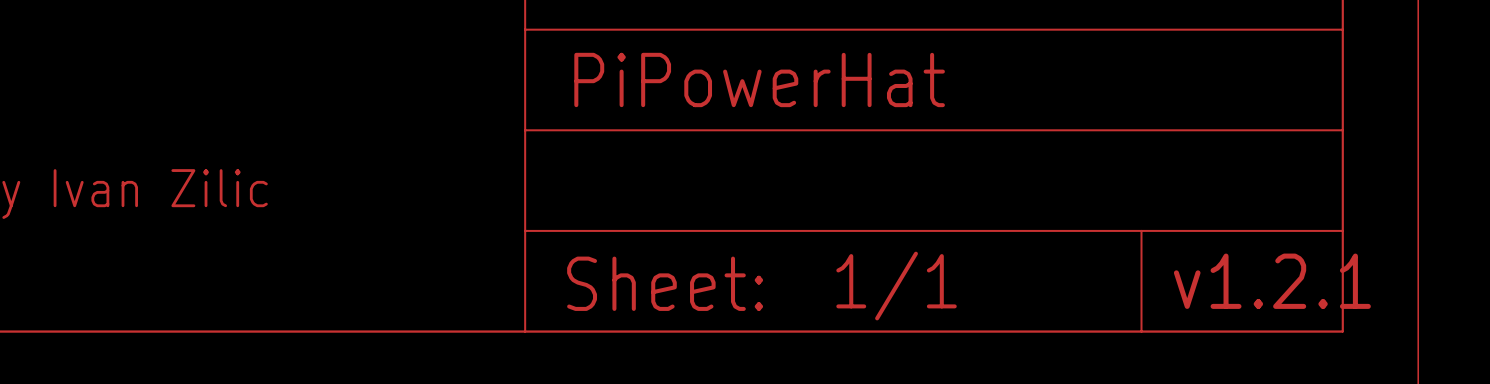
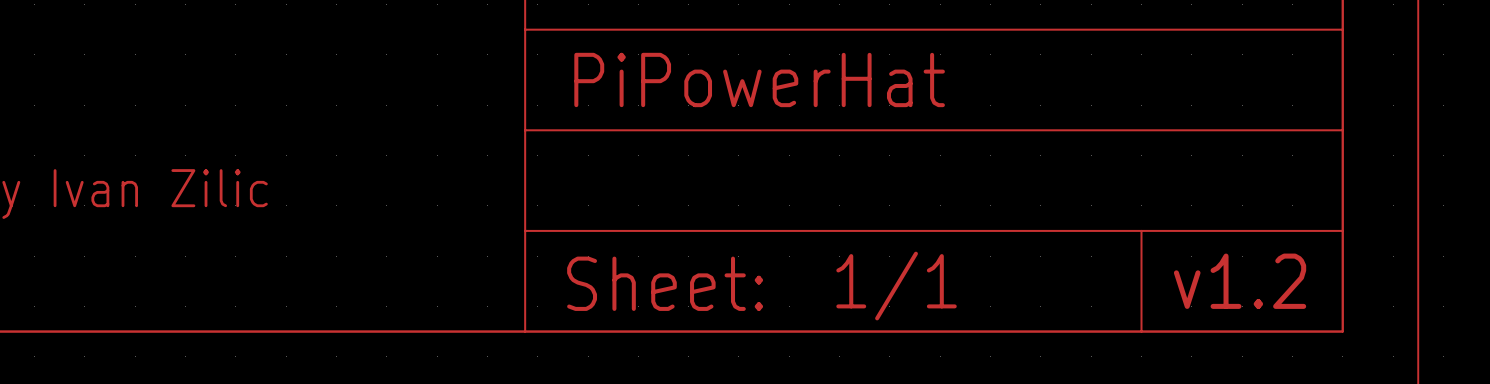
text: v1.2.1 (1272, 281) -> v1.2 (1240, 281)

